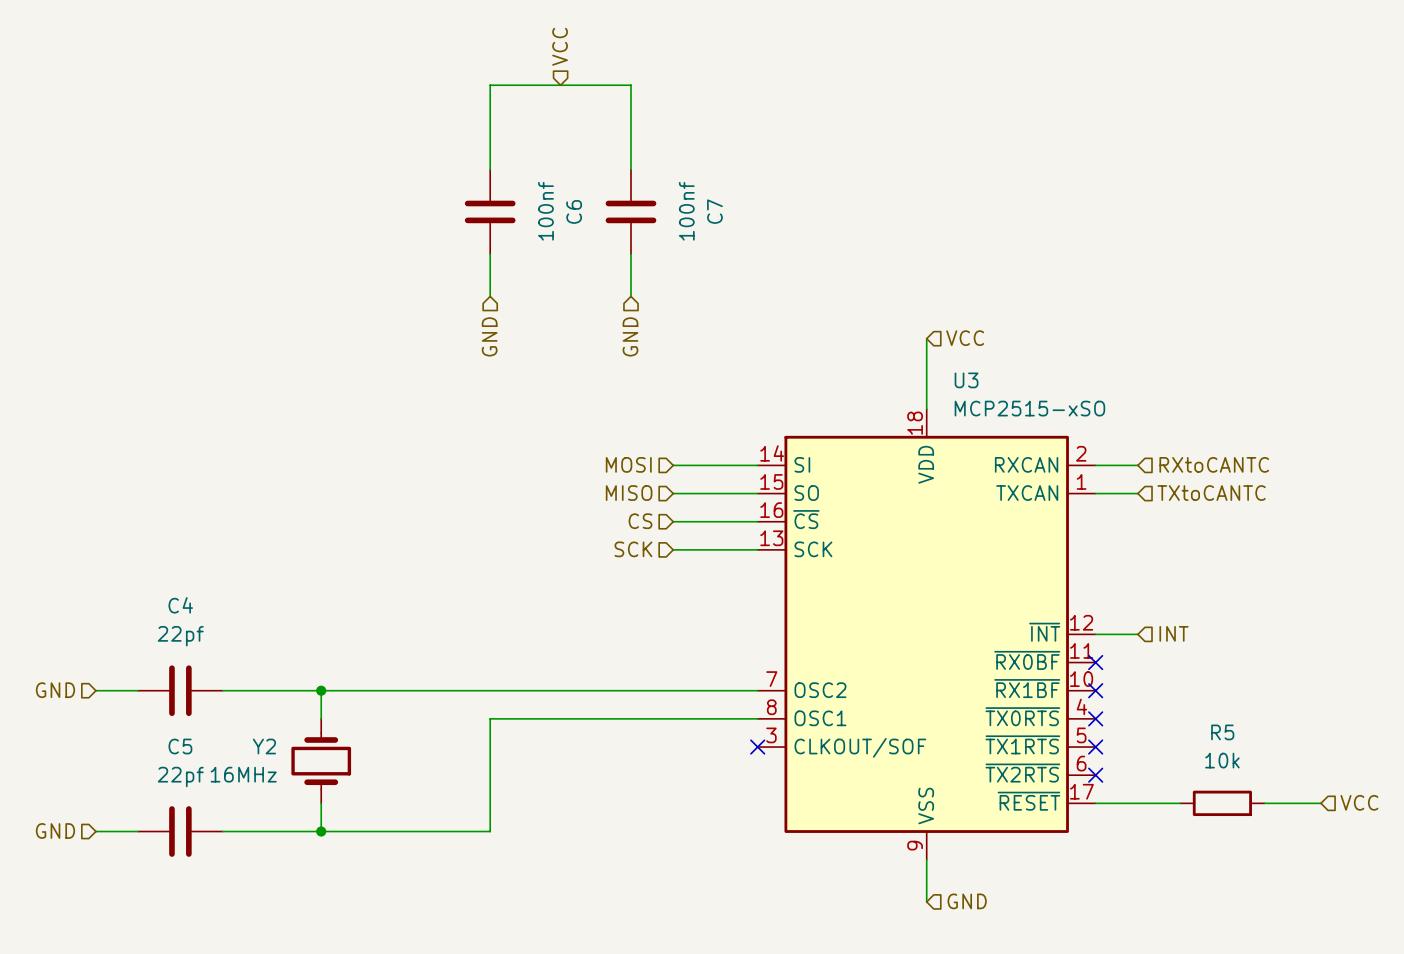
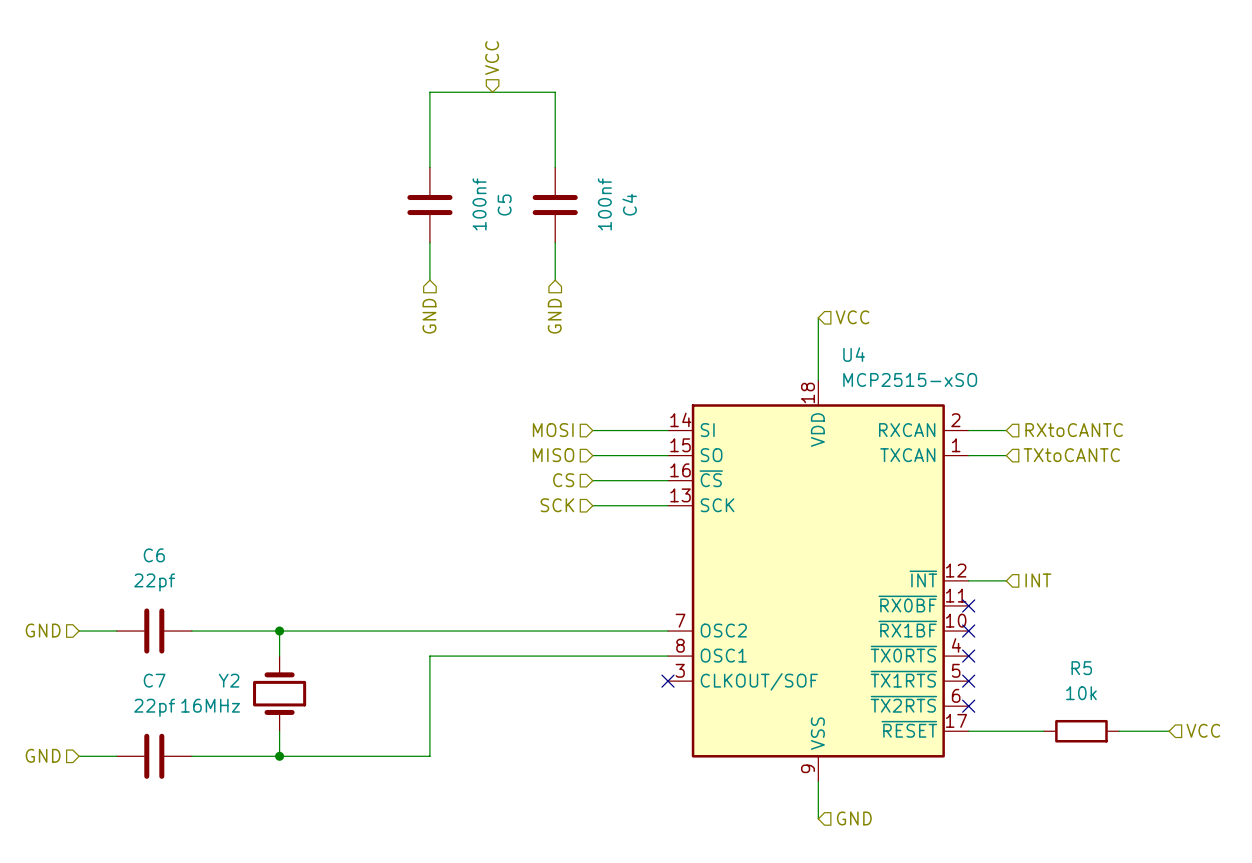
C6 name: C6 (574, 211) -> C5 (504, 205)
C7 name: C7 (714, 211) -> C4 (629, 204)
U3 name: U3 (966, 380) -> U4 (854, 354)
C4 name: C4 (180, 605) -> C6 (154, 555)
C5 name: C5 (180, 746) -> C7 (154, 680)

